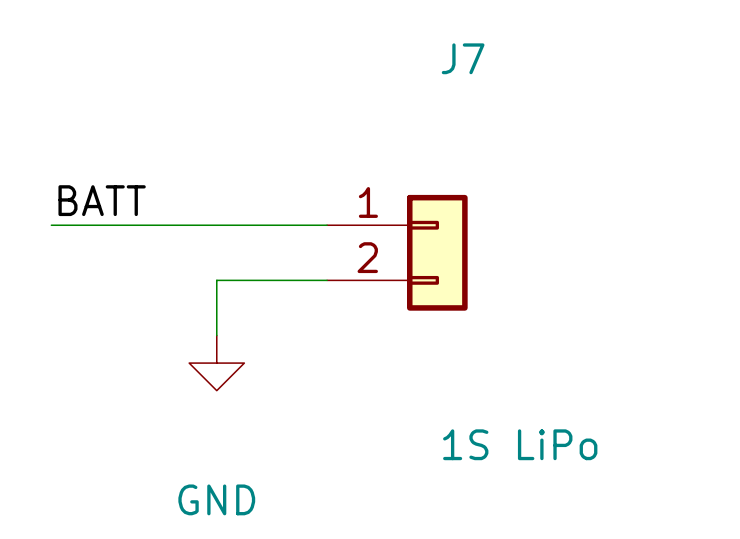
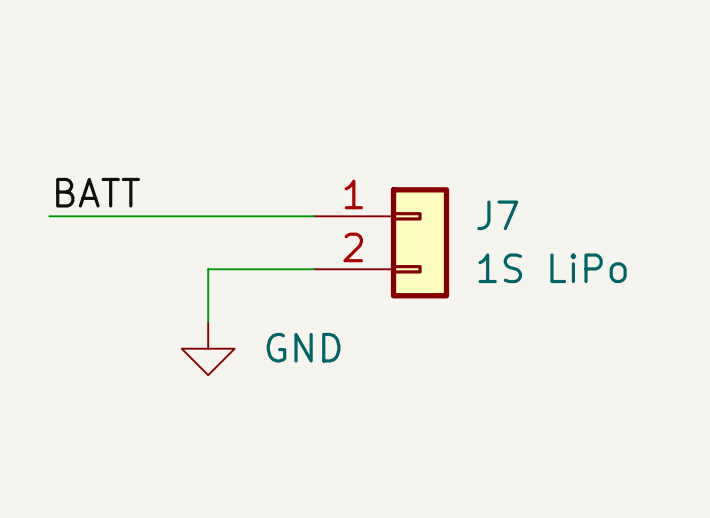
J7 name position: J7 (463, 58) -> J7 (497, 215)
J7 value position: 1S LiPo (520, 444) -> 1S LiPo (552, 268)
power symbol text position: GND (216, 499) -> GND (303, 347)

